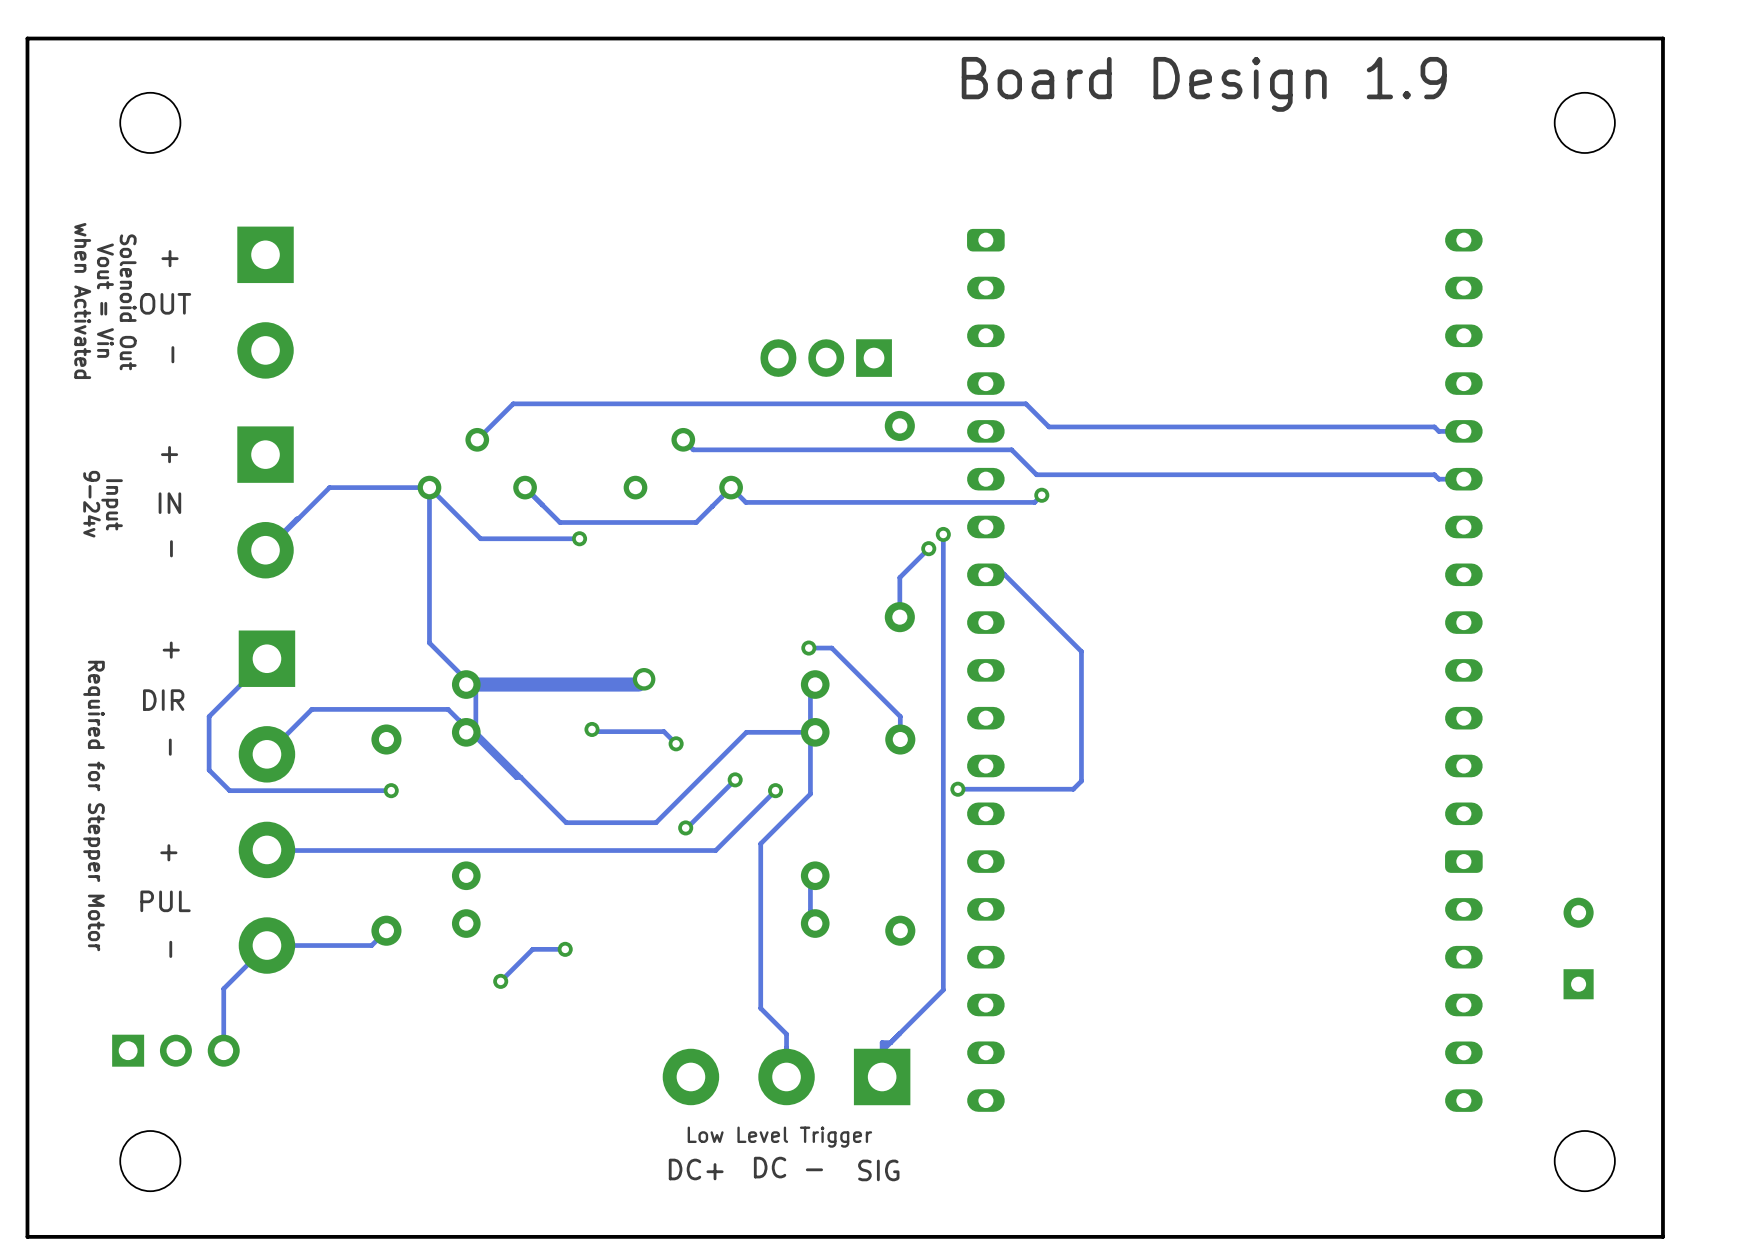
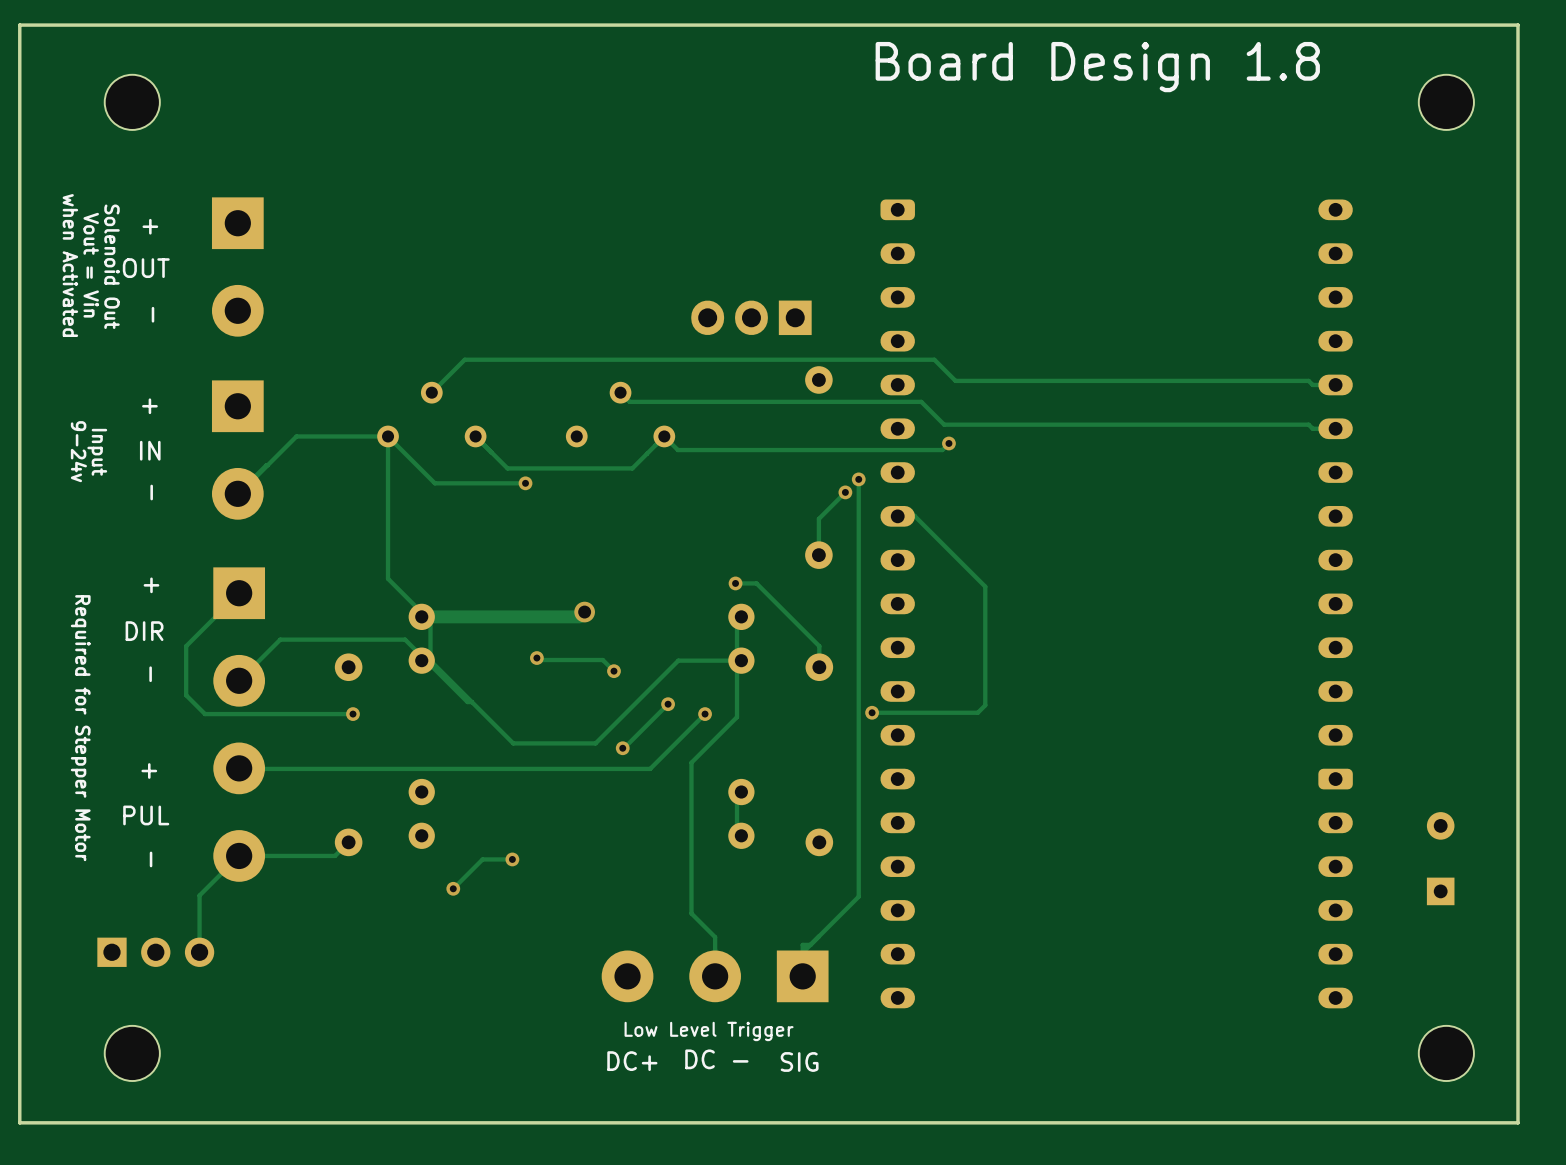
text: Board Design 1.9 (1204, 84) -> Board Design 1.8 (1097, 67)

